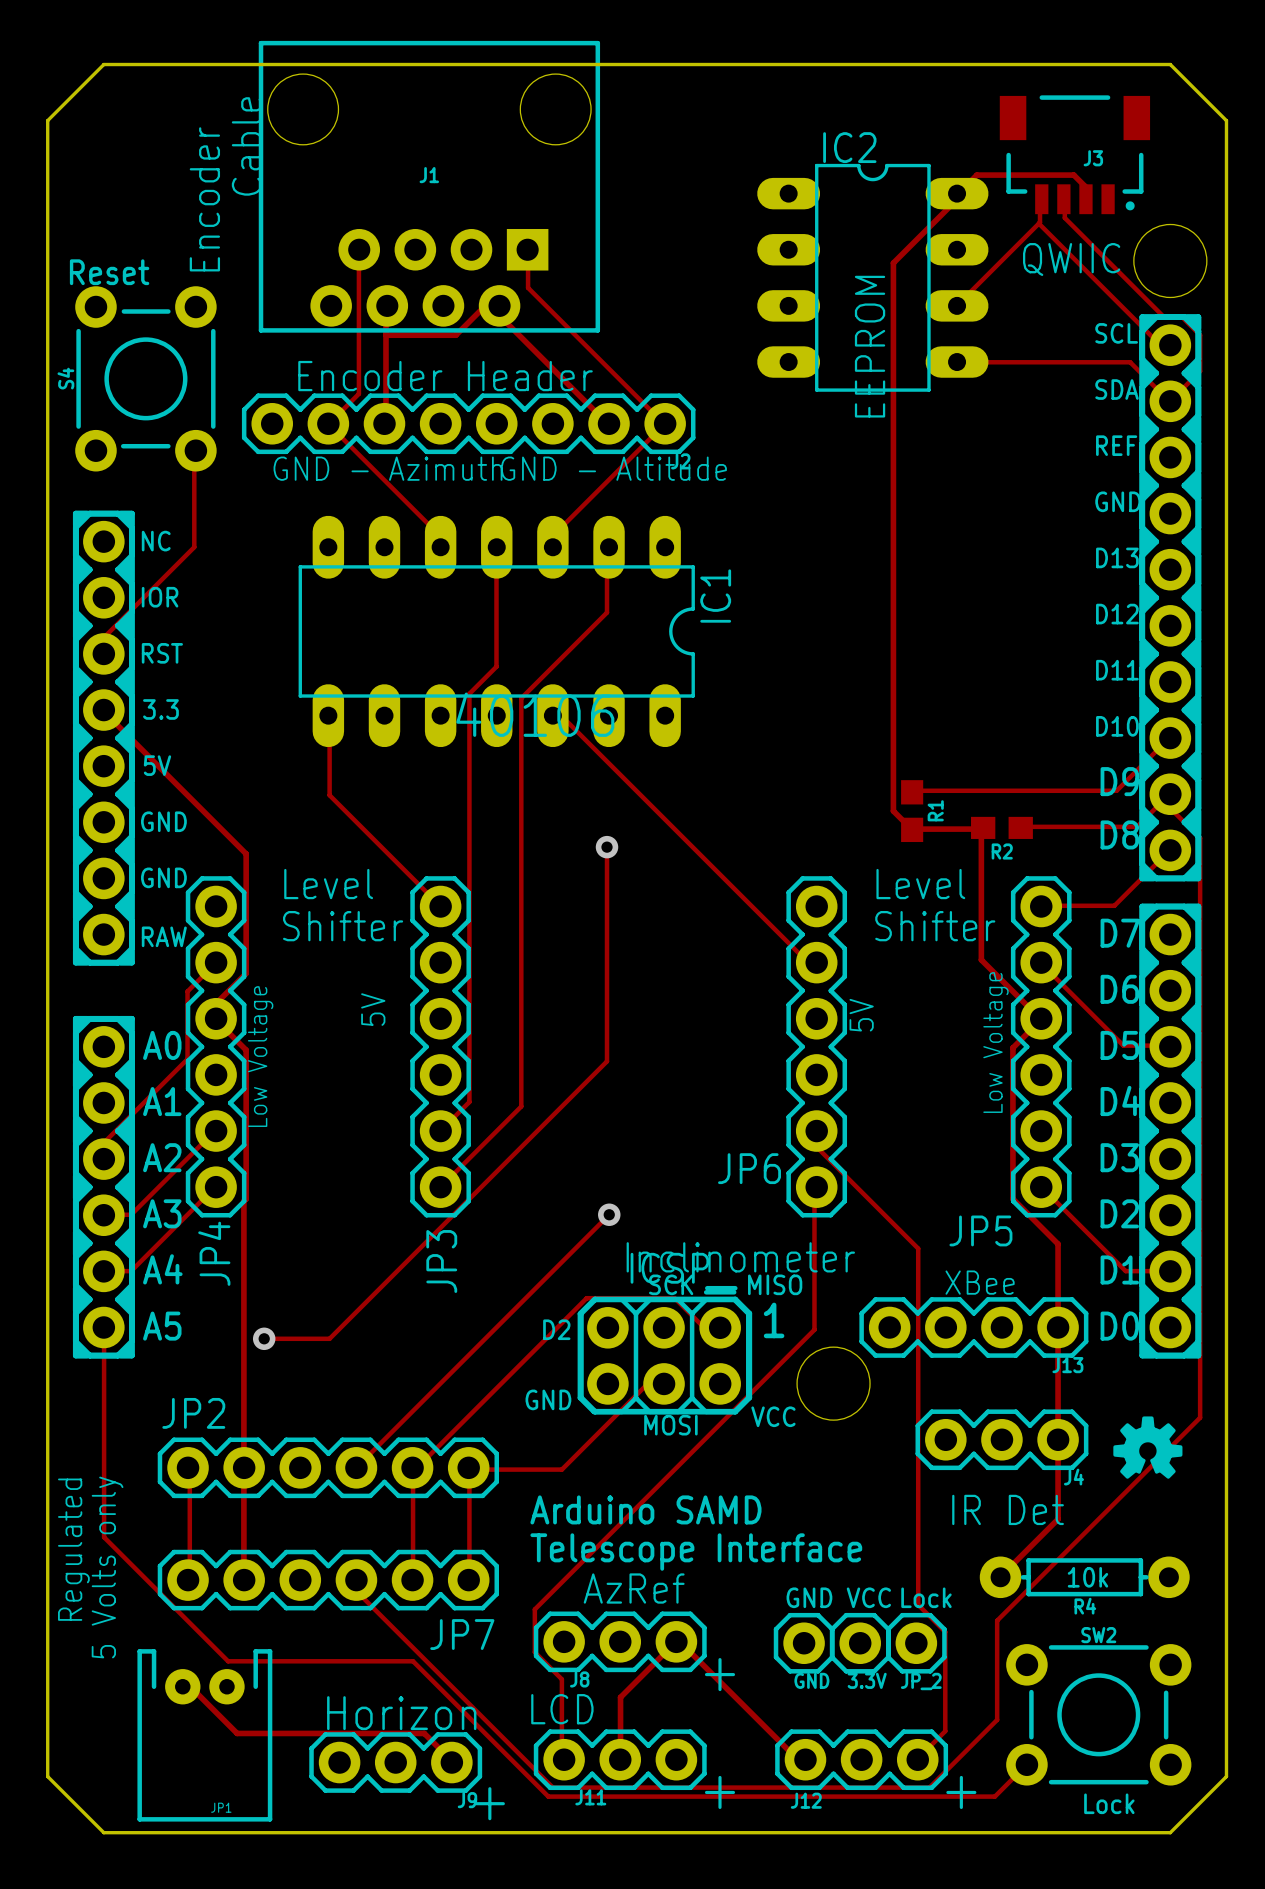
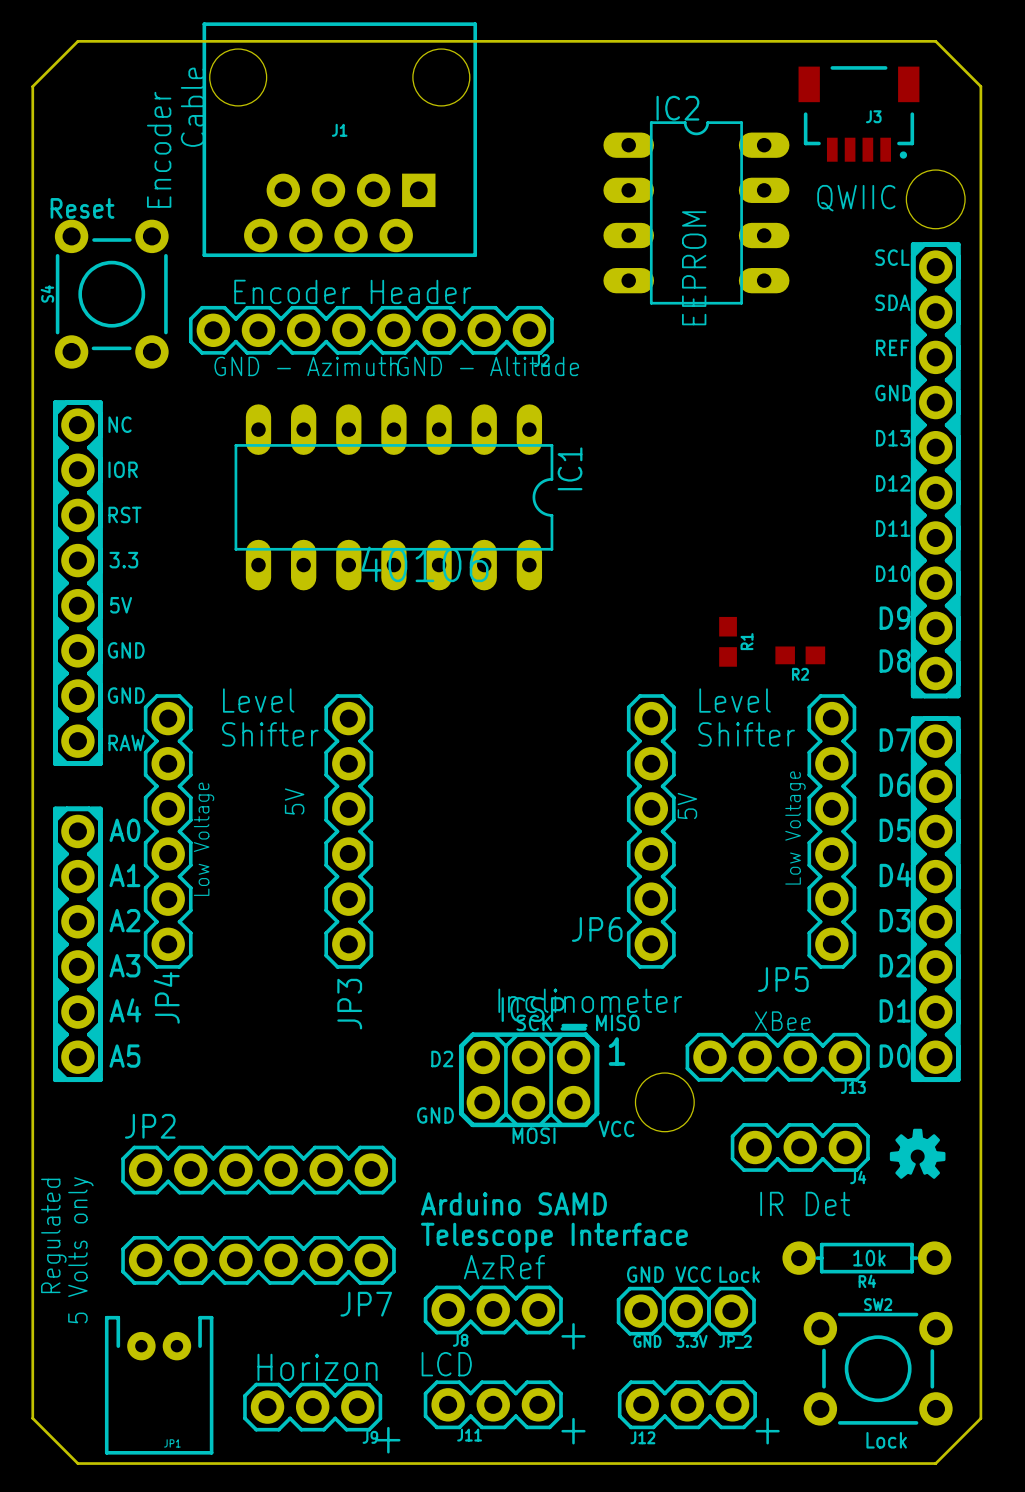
track: (1041, 199) (1040, 199) (1040, 222) (957, 305) -> none
track: (1063, 199) (1064, 217) (1164, 317) (1182, 317) (1200, 335) (1200, 371) (1170, 401) (1130, 362) (957, 362) -> none
track: (1085, 199) (1085, 186) (1073, 175) (976, 175) (957, 193) (956, 199) (893, 263) (893, 811) (912, 829) (983, 827) (981, 831) (981, 959) (1041, 1018) (1012, 1047) (1012, 1198) (1058, 1244) (1058, 1519) (1000, 1577) -> none
track: (1038, 223) (1159, 344) (1170, 345) -> none
track: (359, 249) (358, 393) (328, 423) (440, 535) (440, 547) -> none
track: (527, 249) (528, 287) (665, 423) (555, 533) (555, 547) (552, 547) -> none
track: (387, 305) (384, 423) -> none
track: (385, 335) (455, 335) (485, 305) (499, 305) (501, 317) (609, 423) -> none
track: (195, 450) (194, 452) (194, 547) (104, 637) (103, 653) -> none
track: (496, 547) (496, 666) (469, 693) (469, 1101) (440, 1131) -> none
track: (609, 547) (607, 549) (607, 612) (521, 698) (521, 1106) (440, 1187) -> none
track: (103, 710) (246, 853) (246, 973) (216, 1002) (216, 1018) (246, 1050) (246, 1198) (243, 1201) (244, 1580) -> none
track: (328, 715) (329, 795) (440, 906) -> none
track: (552, 715) (561, 716) (807, 962) (816, 962) -> none
track: (1170, 738) (1116, 790) (913, 790) (912, 792) -> none
track: (1020, 827) (1136, 826) (1170, 794) (1164, 802) (1200, 838) (1200, 1417) (997, 1620) (997, 1719) (929, 1787) (552, 1787) (356, 1591) (356, 1580) -> none
track: (607, 847) (607, 1061) (329, 1338) (264, 1338) -> none
via: (607, 847) -> none
track: (1170, 850) (1114, 905) (1041, 906) -> none
track: (216, 962) (187, 991) (187, 1059) (104, 1142) (103, 1159) -> none
track: (1041, 962) (1123, 1045) (1170, 1046) -> none
track: (216, 1131) (131, 1214) (103, 1215) -> none
track: (816, 1131) (816, 1147) (918, 1248) (918, 1604) (945, 1631) (945, 1731) (917, 1759) -> none
track: (216, 1187) (131, 1271) (104, 1271) -> none
track: (816, 1187) (814, 1187) (814, 1329) (534, 1609) (534, 1652) (561, 1679) (561, 1758) (564, 1759) -> none
track: (1041, 1187) (1125, 1271) (1170, 1271) -> none
track: (609, 1214) (356, 1467) -> none
via: (609, 1214) -> none
track: (104, 1327) (104, 1537) (228, 1661) (413, 1661) (548, 1796) (994, 1796) (1026, 1764) -> none
track: (720, 1327) (703, 1327) (674, 1298) (586, 1298) (415, 1469) (412, 1467) (412, 1580) -> none
via: (264, 1338) -> none
track: (664, 1383) (663, 1386) (645, 1386) (561, 1469) (471, 1469) (468, 1467) (468, 1580) -> none
track: (188, 1467) (189, 1469) (189, 1577) (188, 1580) -> none
track: (182, 1686) (183, 1688) (192, 1688) (237, 1733) (424, 1733) (451, 1762) -> none
track: (620, 1759) (620, 1697) (674, 1643) (679, 1640) (796, 1758) (805, 1759) -> none

